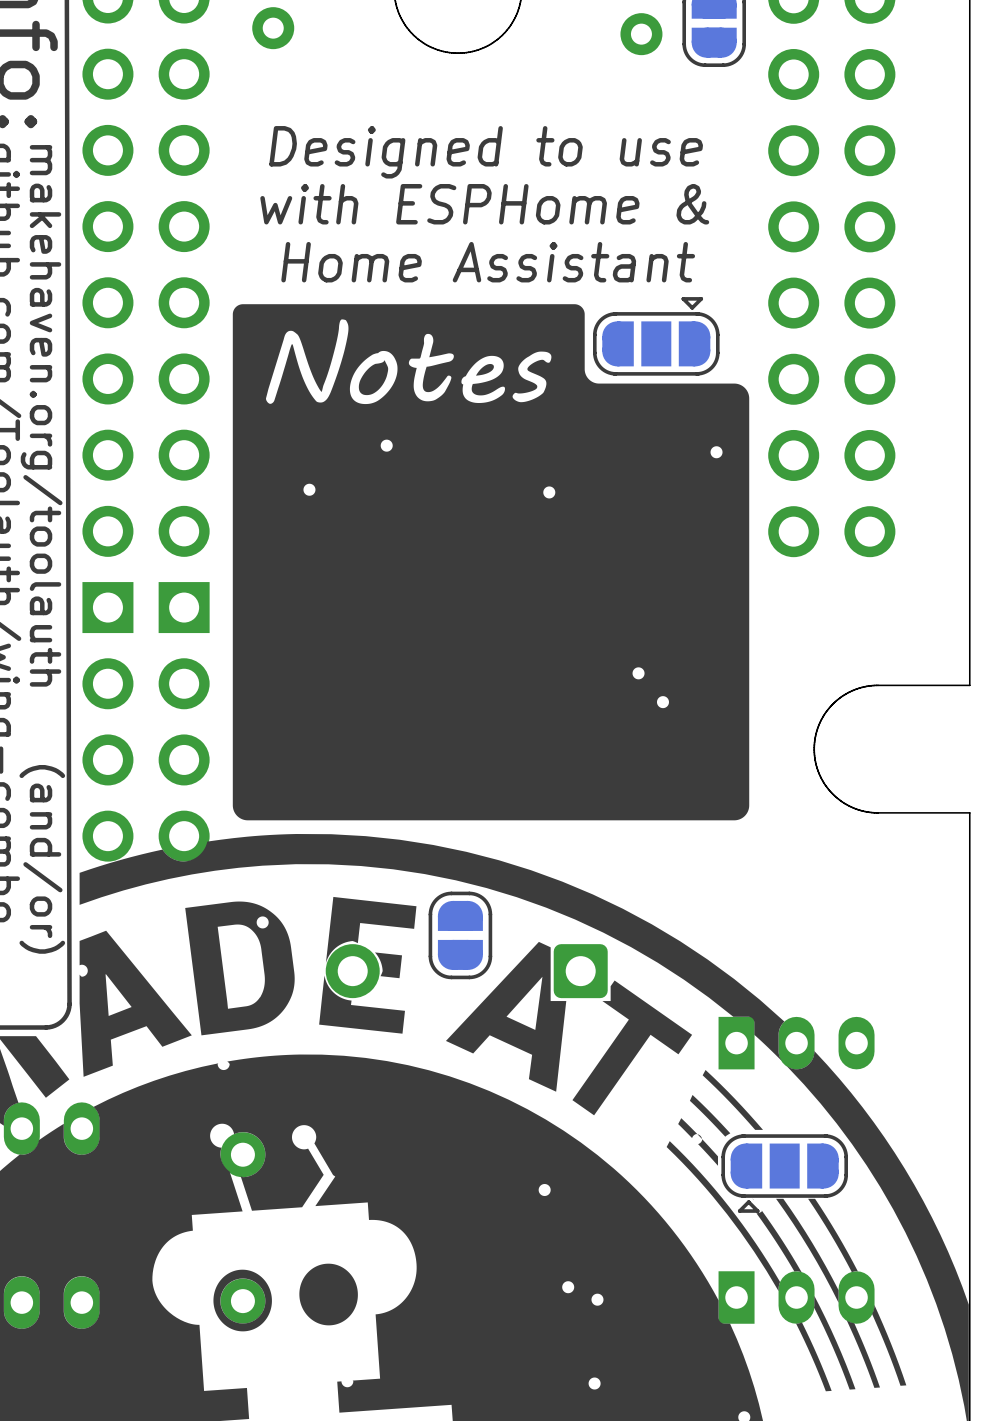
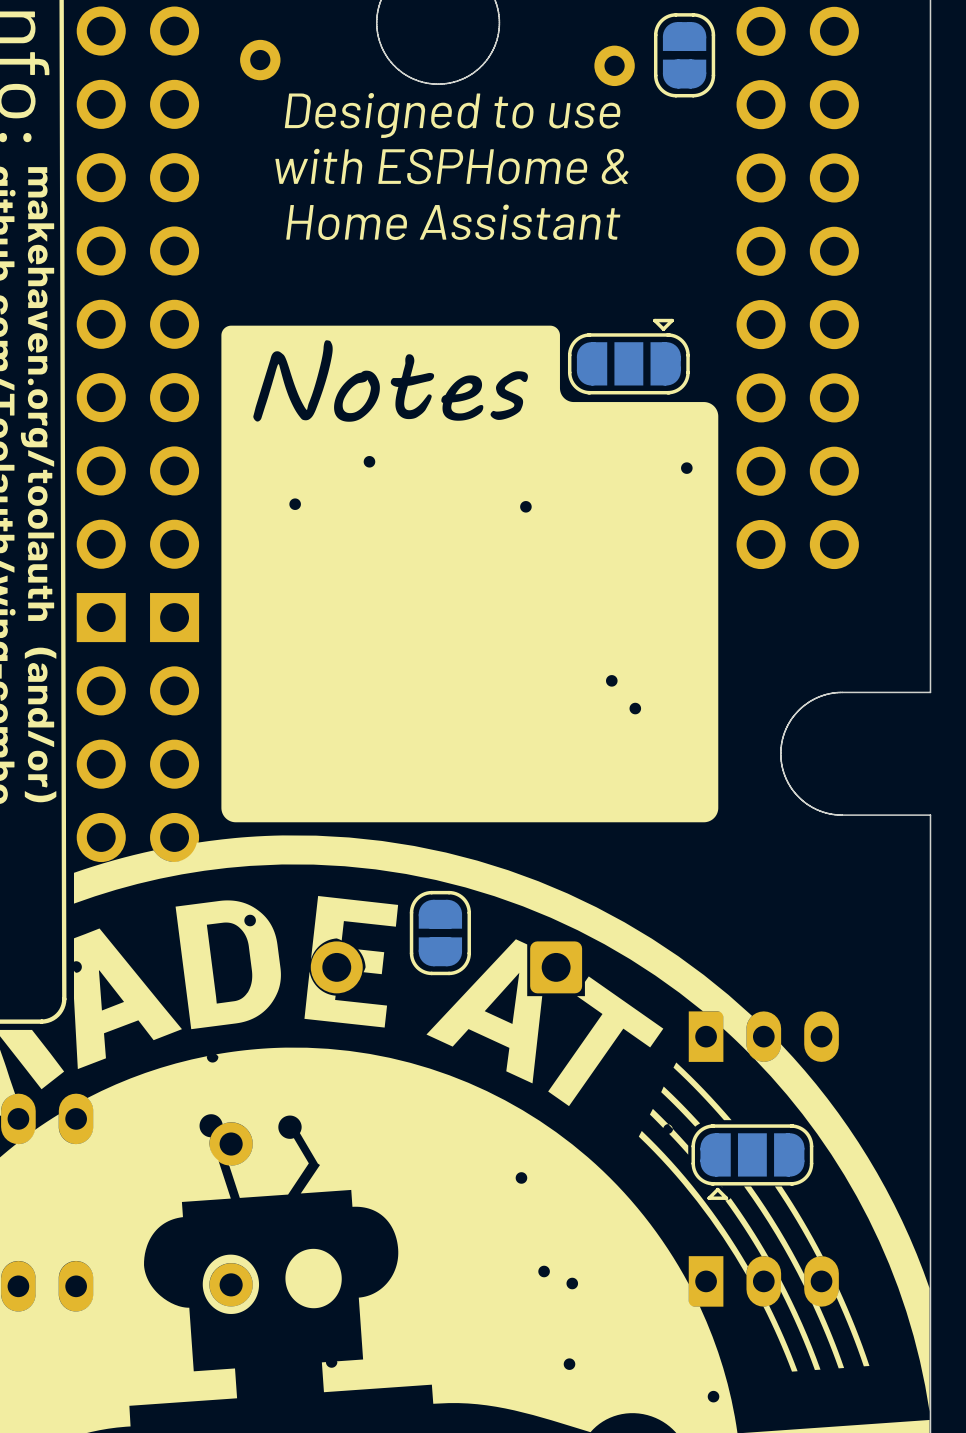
text: none -> Designed to use (452, 115)
text: Designed to use (486, 152) -> with ESPHome & (452, 166)
text: with ESPHome & (484, 204) -> Home Assistant (453, 222)
text: Home Assistant (488, 262) -> none

